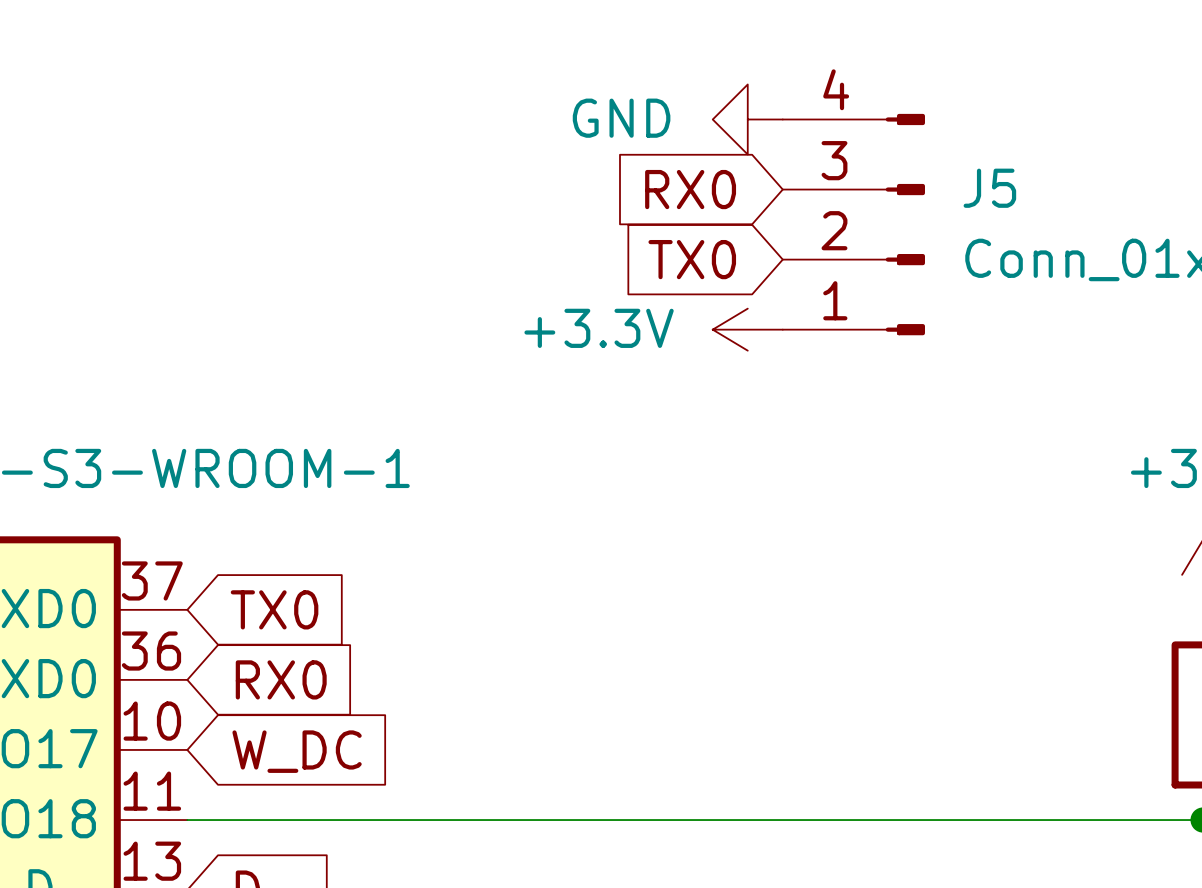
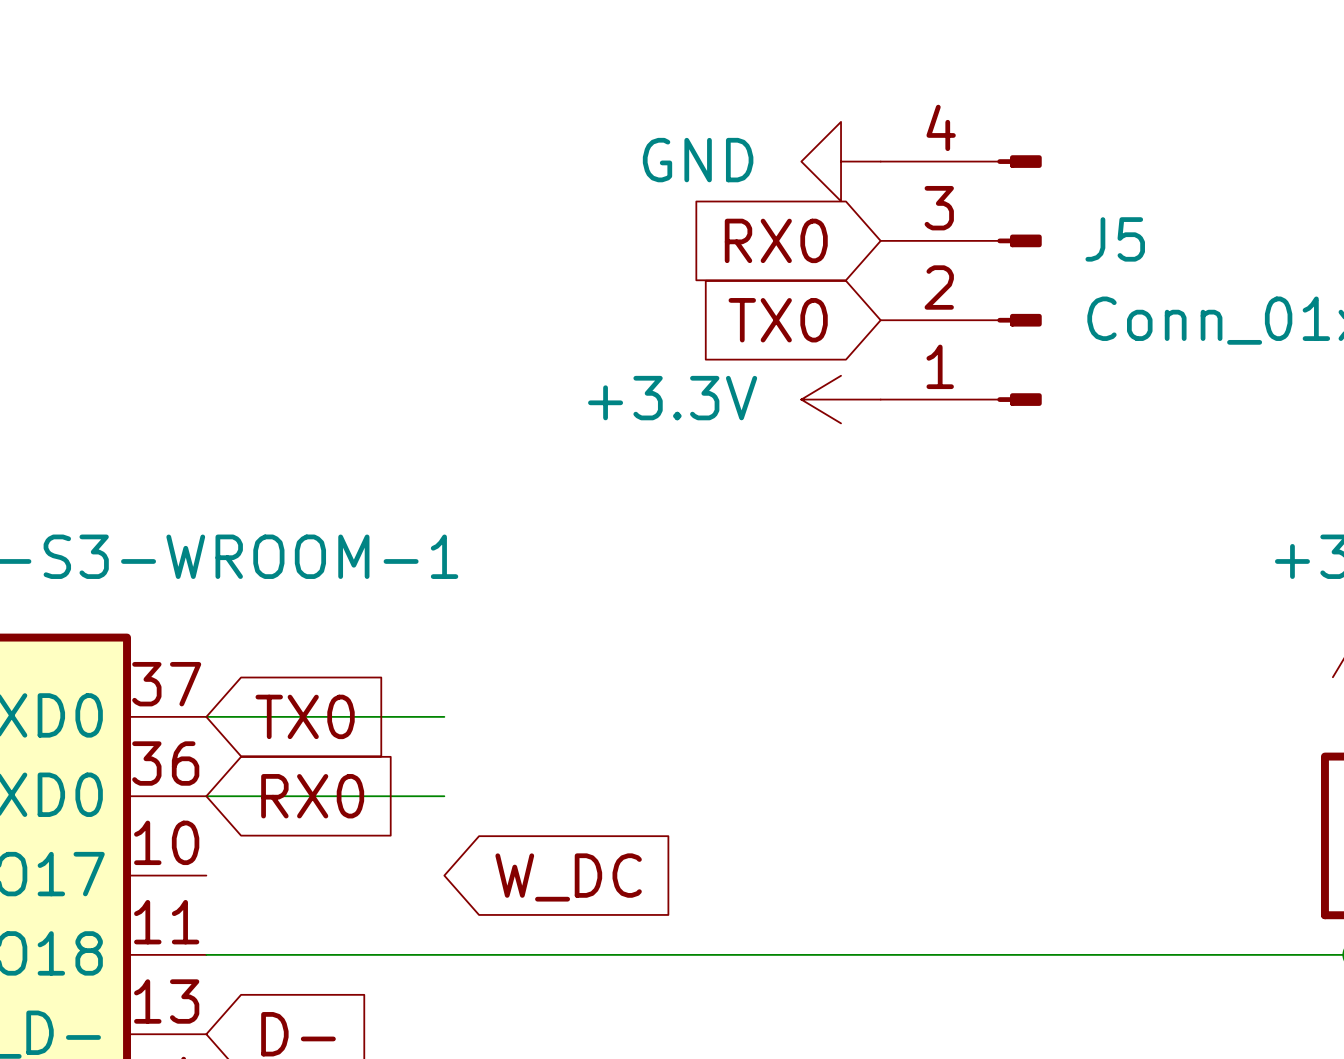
wire: none -> (206, 716) (444, 716)
wire: none -> (206, 796) (444, 796)
global label position: W_DC (297, 751) -> W_DC (568, 877)

